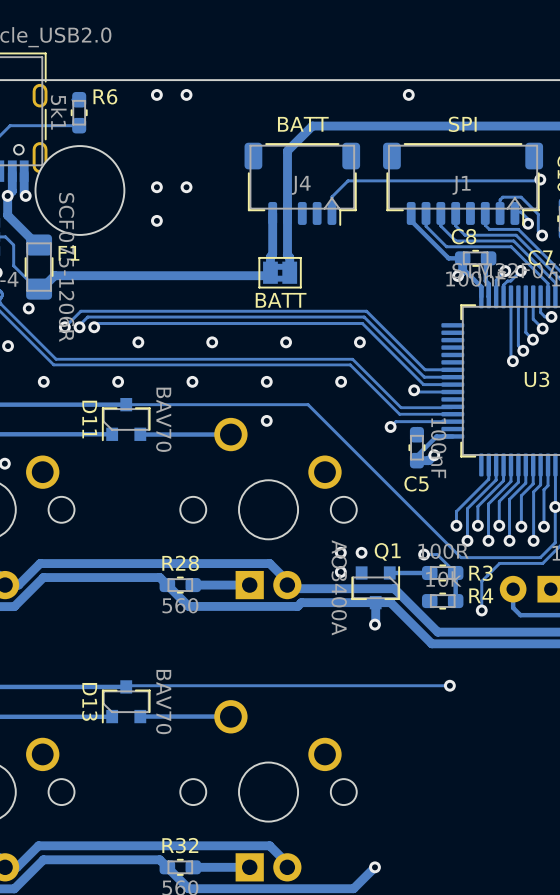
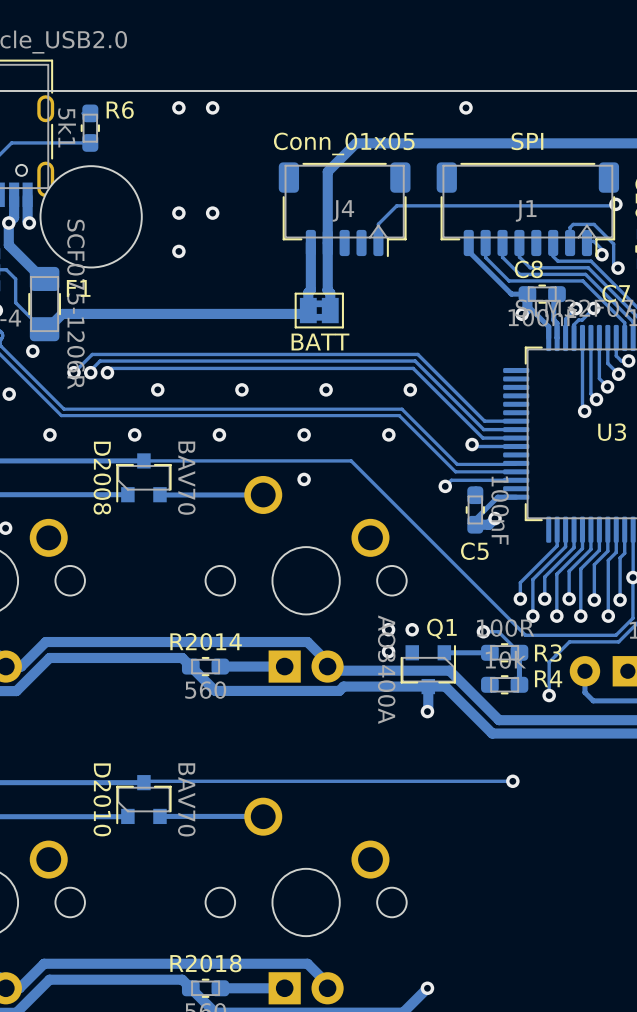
J4 value: BATT (303, 124) -> Conn_01x05 (344, 143)
D11 name: D11 (89, 419) -> D2008 (102, 478)
R28 name: R28 (180, 563) -> R2014 (206, 641)
D13 name: D13 (89, 701) -> D2010 (102, 799)
R32 name: R32 (180, 845) -> R2018 (205, 963)

